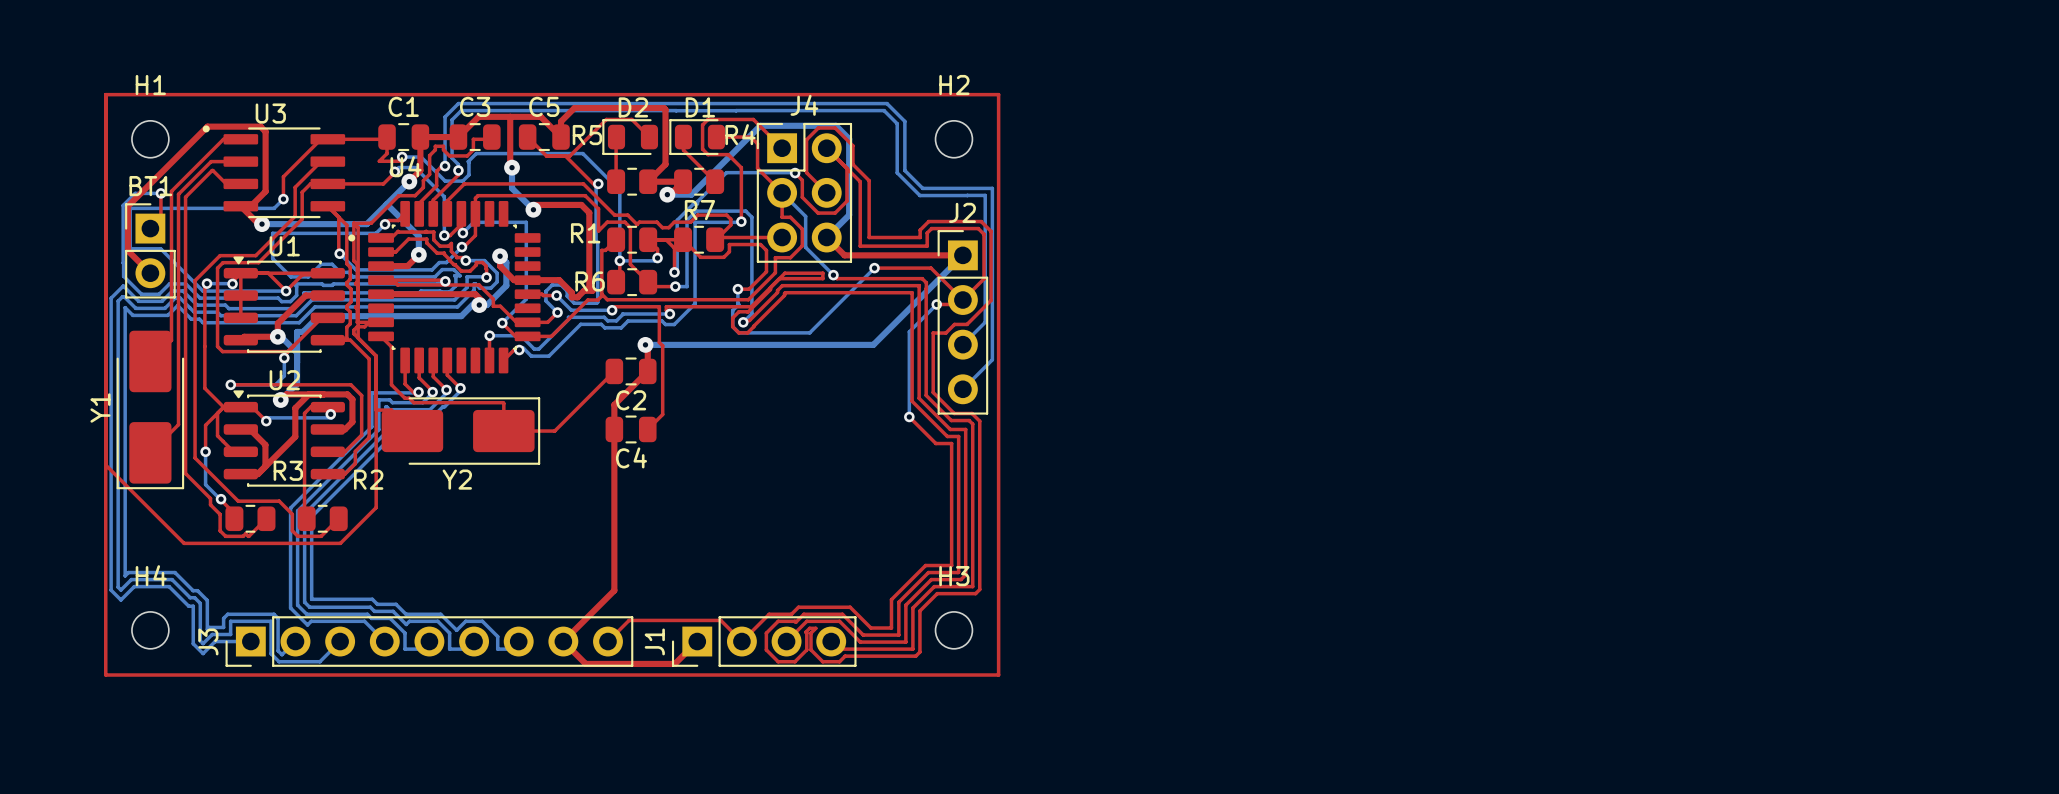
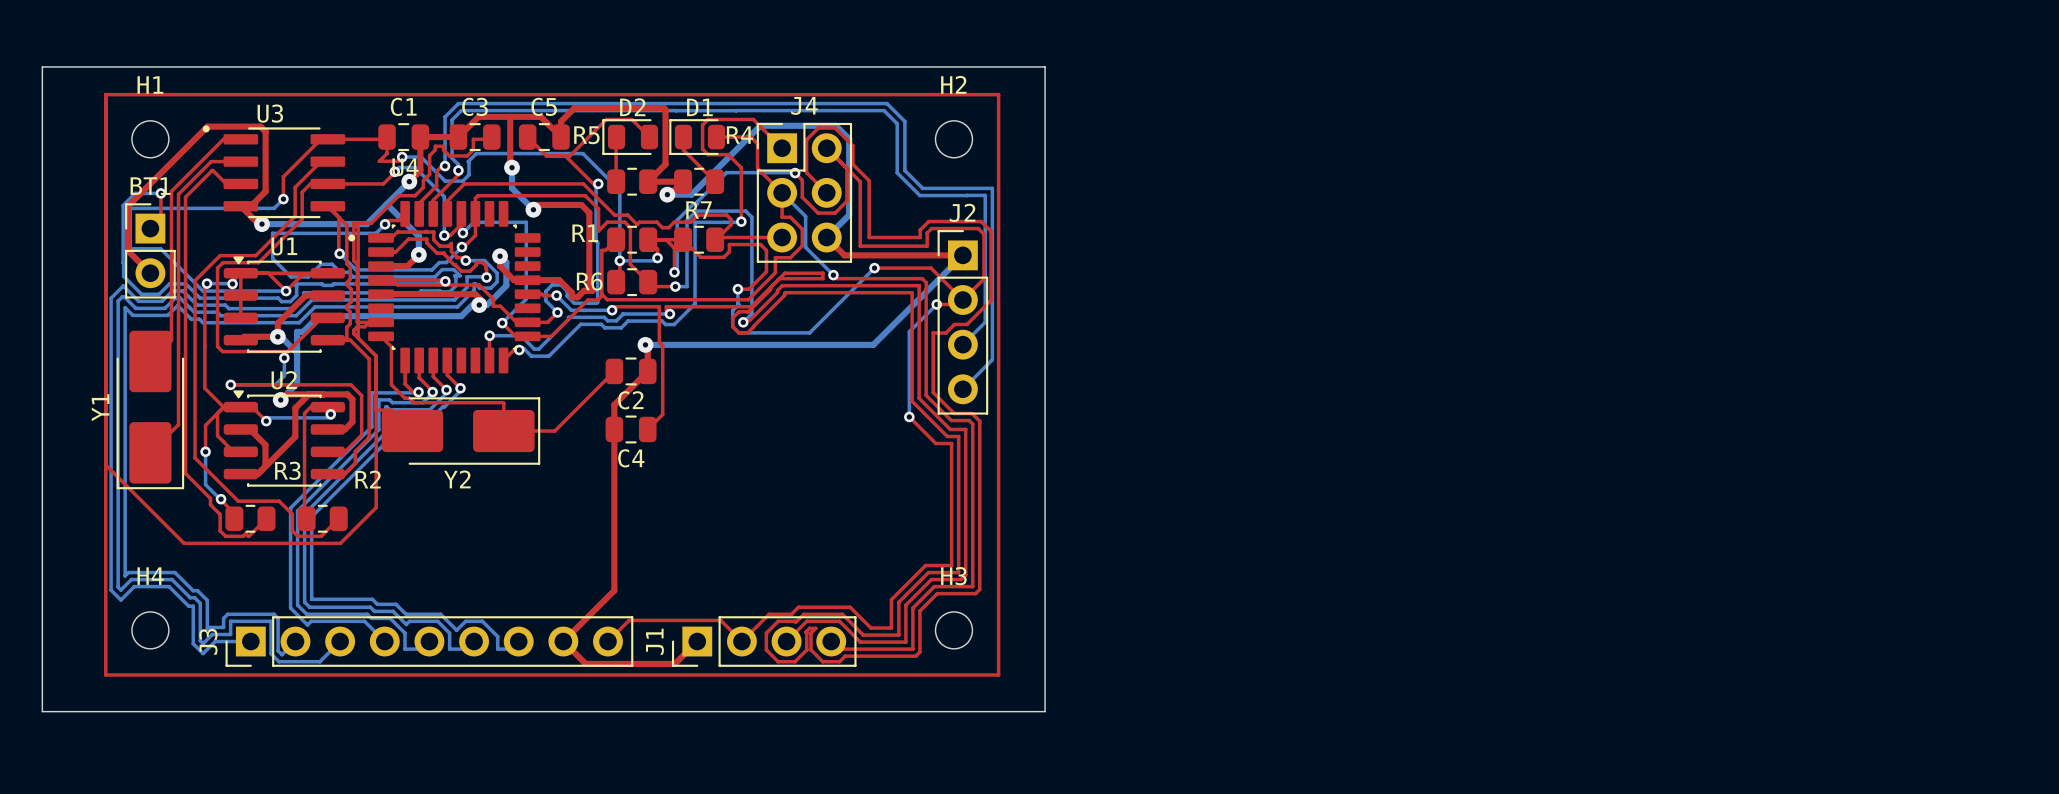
board edge: none -> (42, 66) (1045, 66) (1045, 711) (42, 711) (42, 66)

